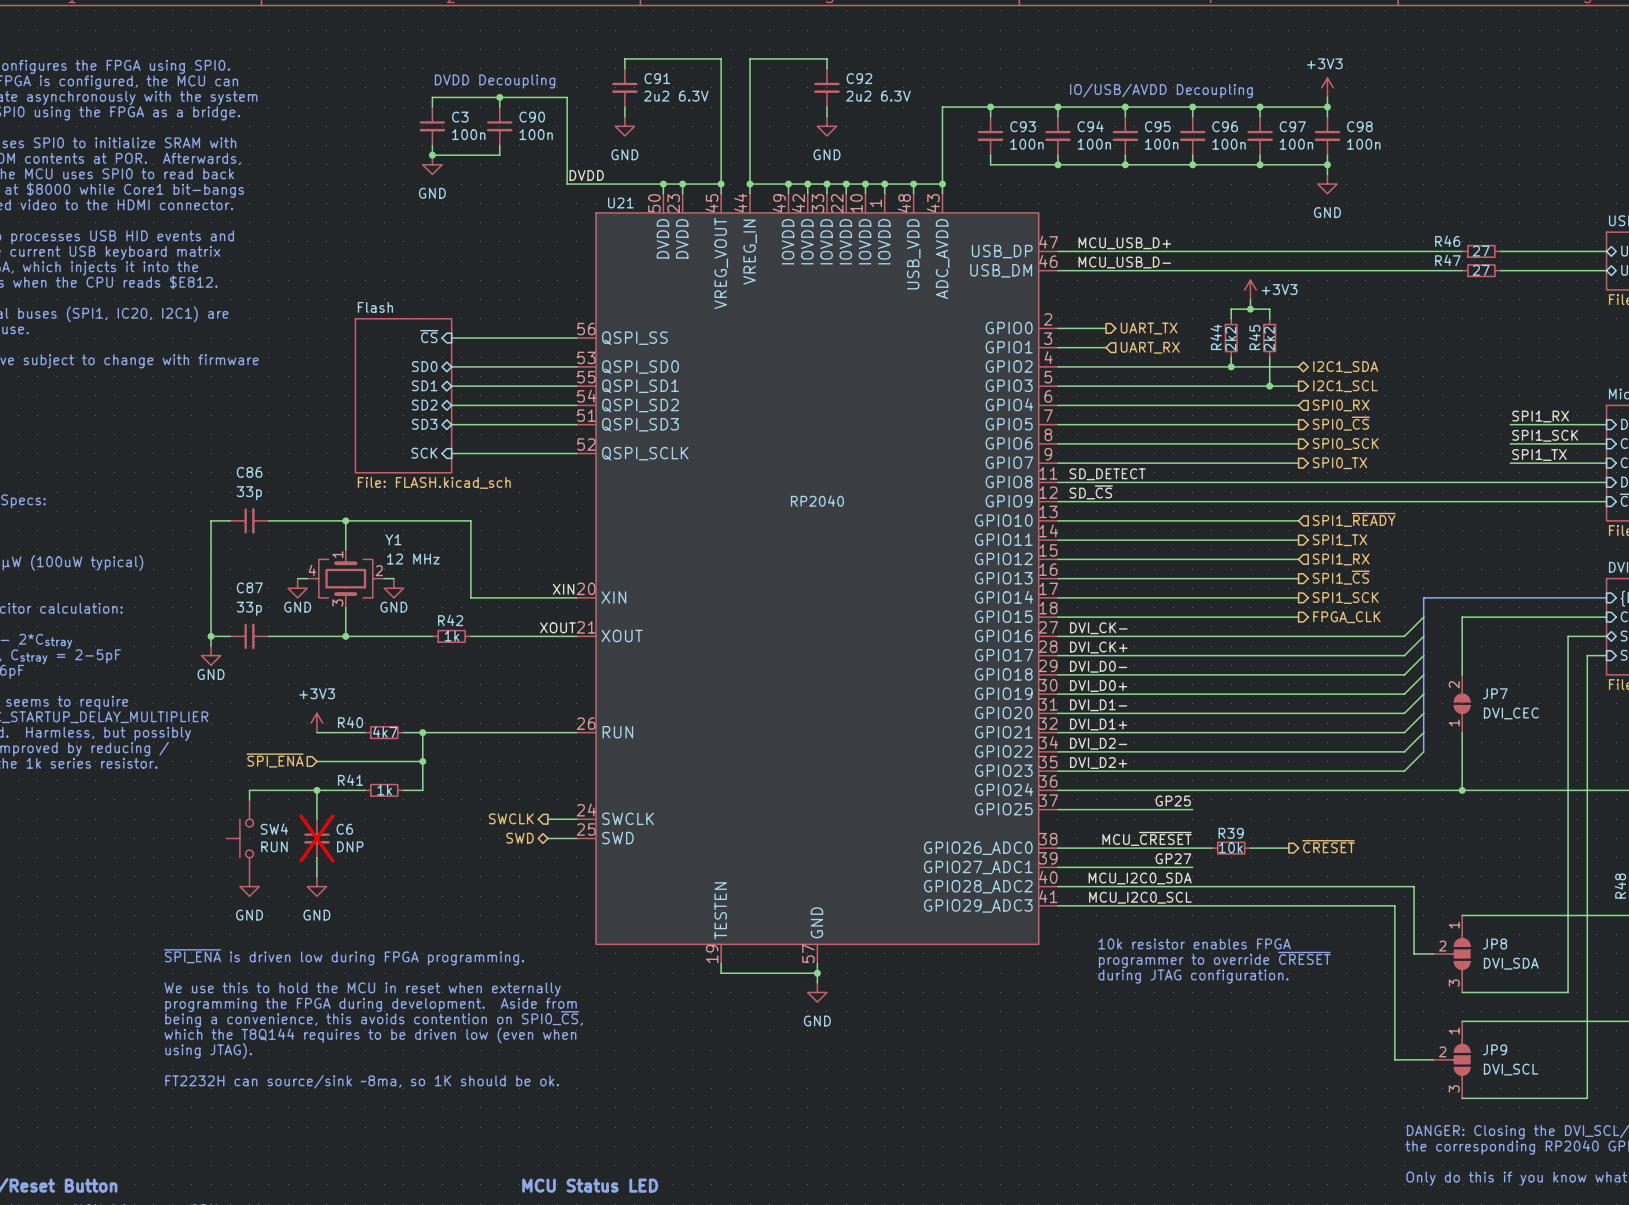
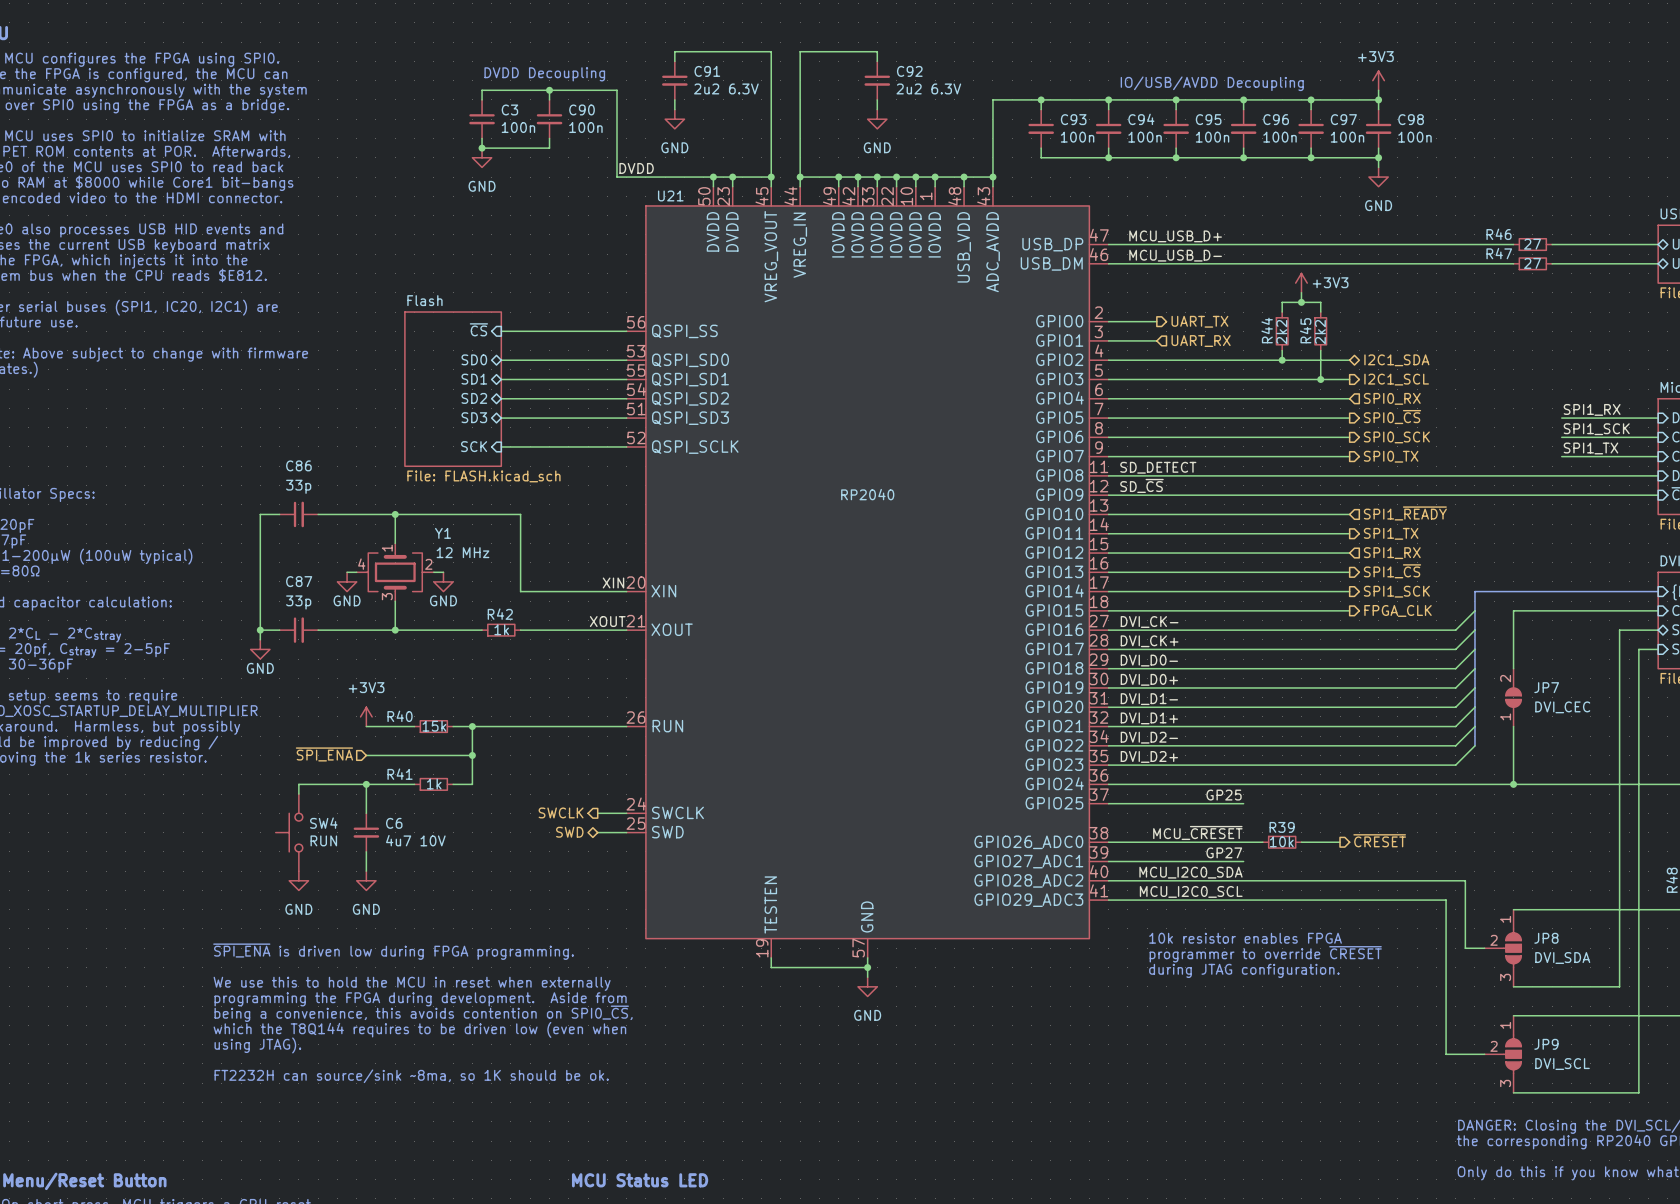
R40 value: 4k7 (385, 732) -> 15k (434, 726)
C6 do-not-place cross: (316, 838) -> none
C6 value: DNP (350, 846) -> 4u7 10V (415, 840)

